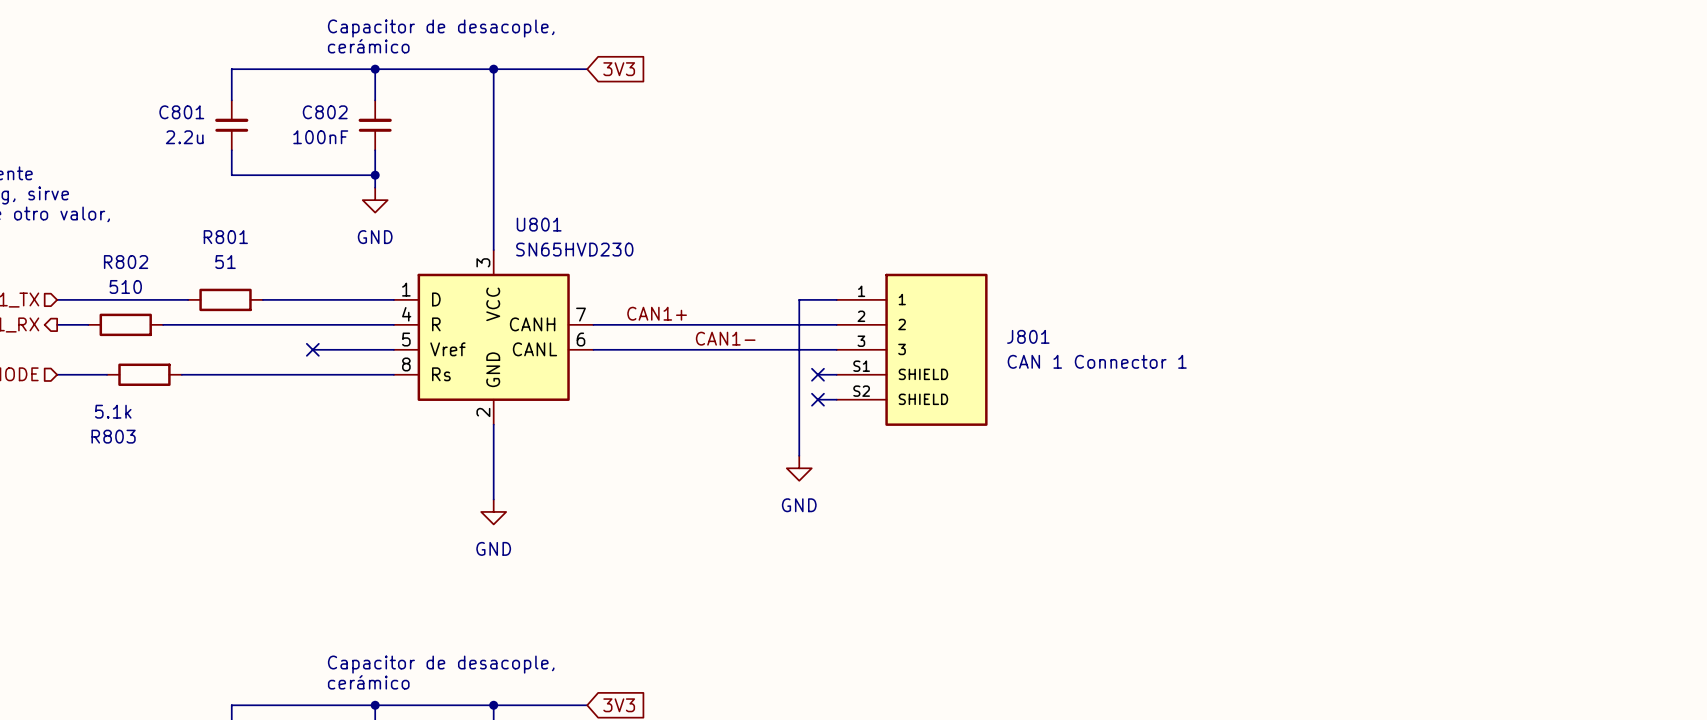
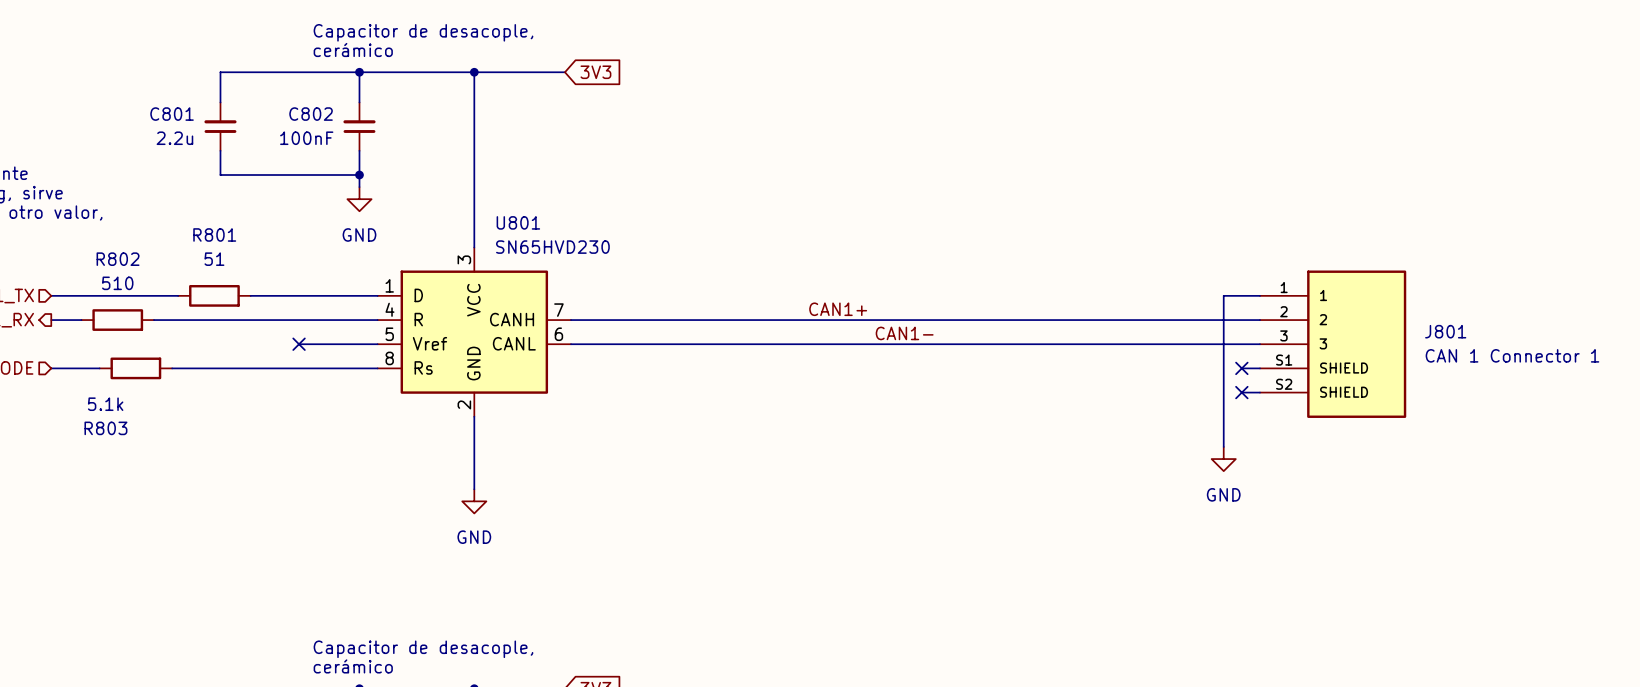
wire: (836, 299) (799, 299) (799, 455) -> none
wire: none -> (1259, 295) (1223, 295) (1223, 446)
label position: CAN1+ (657, 313) -> CAN1+ (838, 309)
wire: none -> (806, 320) (1259, 320)
label position: CAN1- (725, 338) -> CAN1- (904, 333)
wire: none -> (806, 344) (1259, 344)
J801 position: (912, 349) -> (1333, 344)
wire: (817, 374) (836, 374) -> none
no-connect mark: (817, 374) -> none
wire: none -> (1241, 368) (1259, 368)
no-connect mark: none -> (1241, 368)
wire: (817, 399) (836, 399) -> none
no-connect mark: (817, 399) -> none
wire: none -> (1241, 392) (1259, 392)
no-connect mark: none -> (1241, 392)
power symbol: GND (799, 468) -> none
power symbol: none -> GND (1223, 459)

